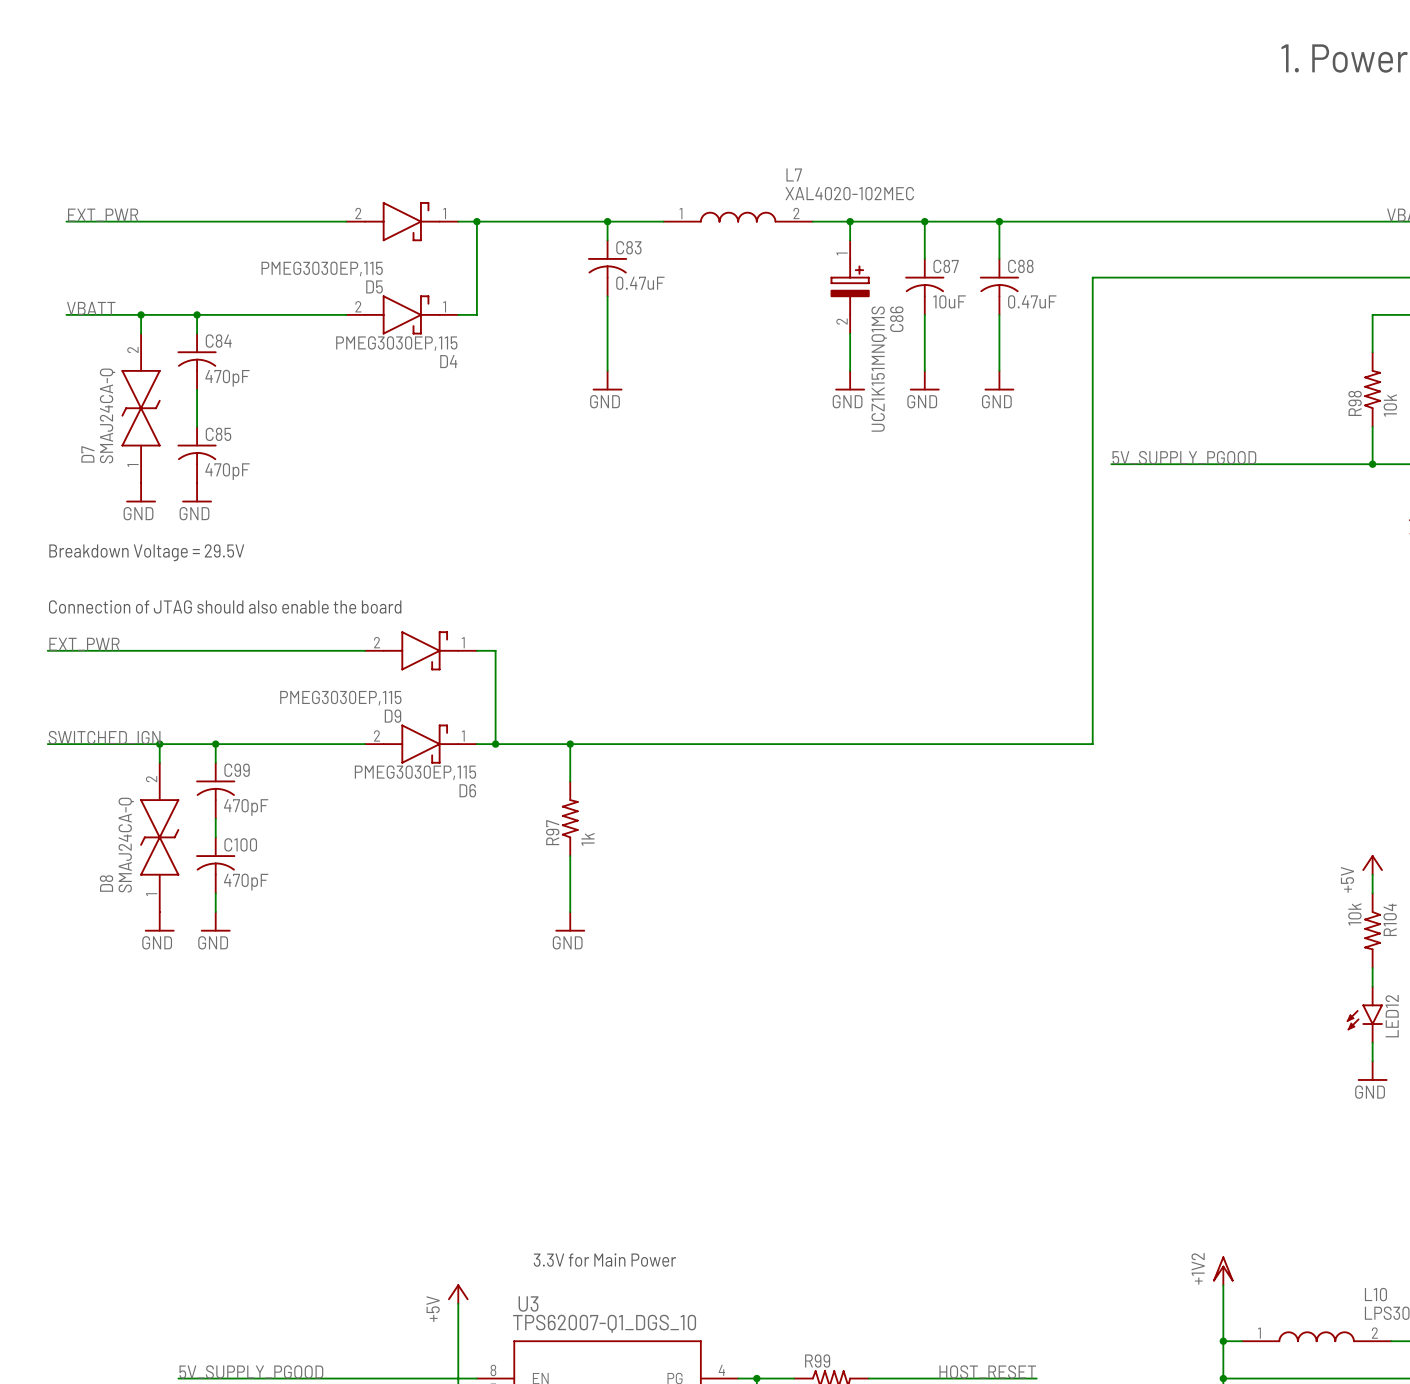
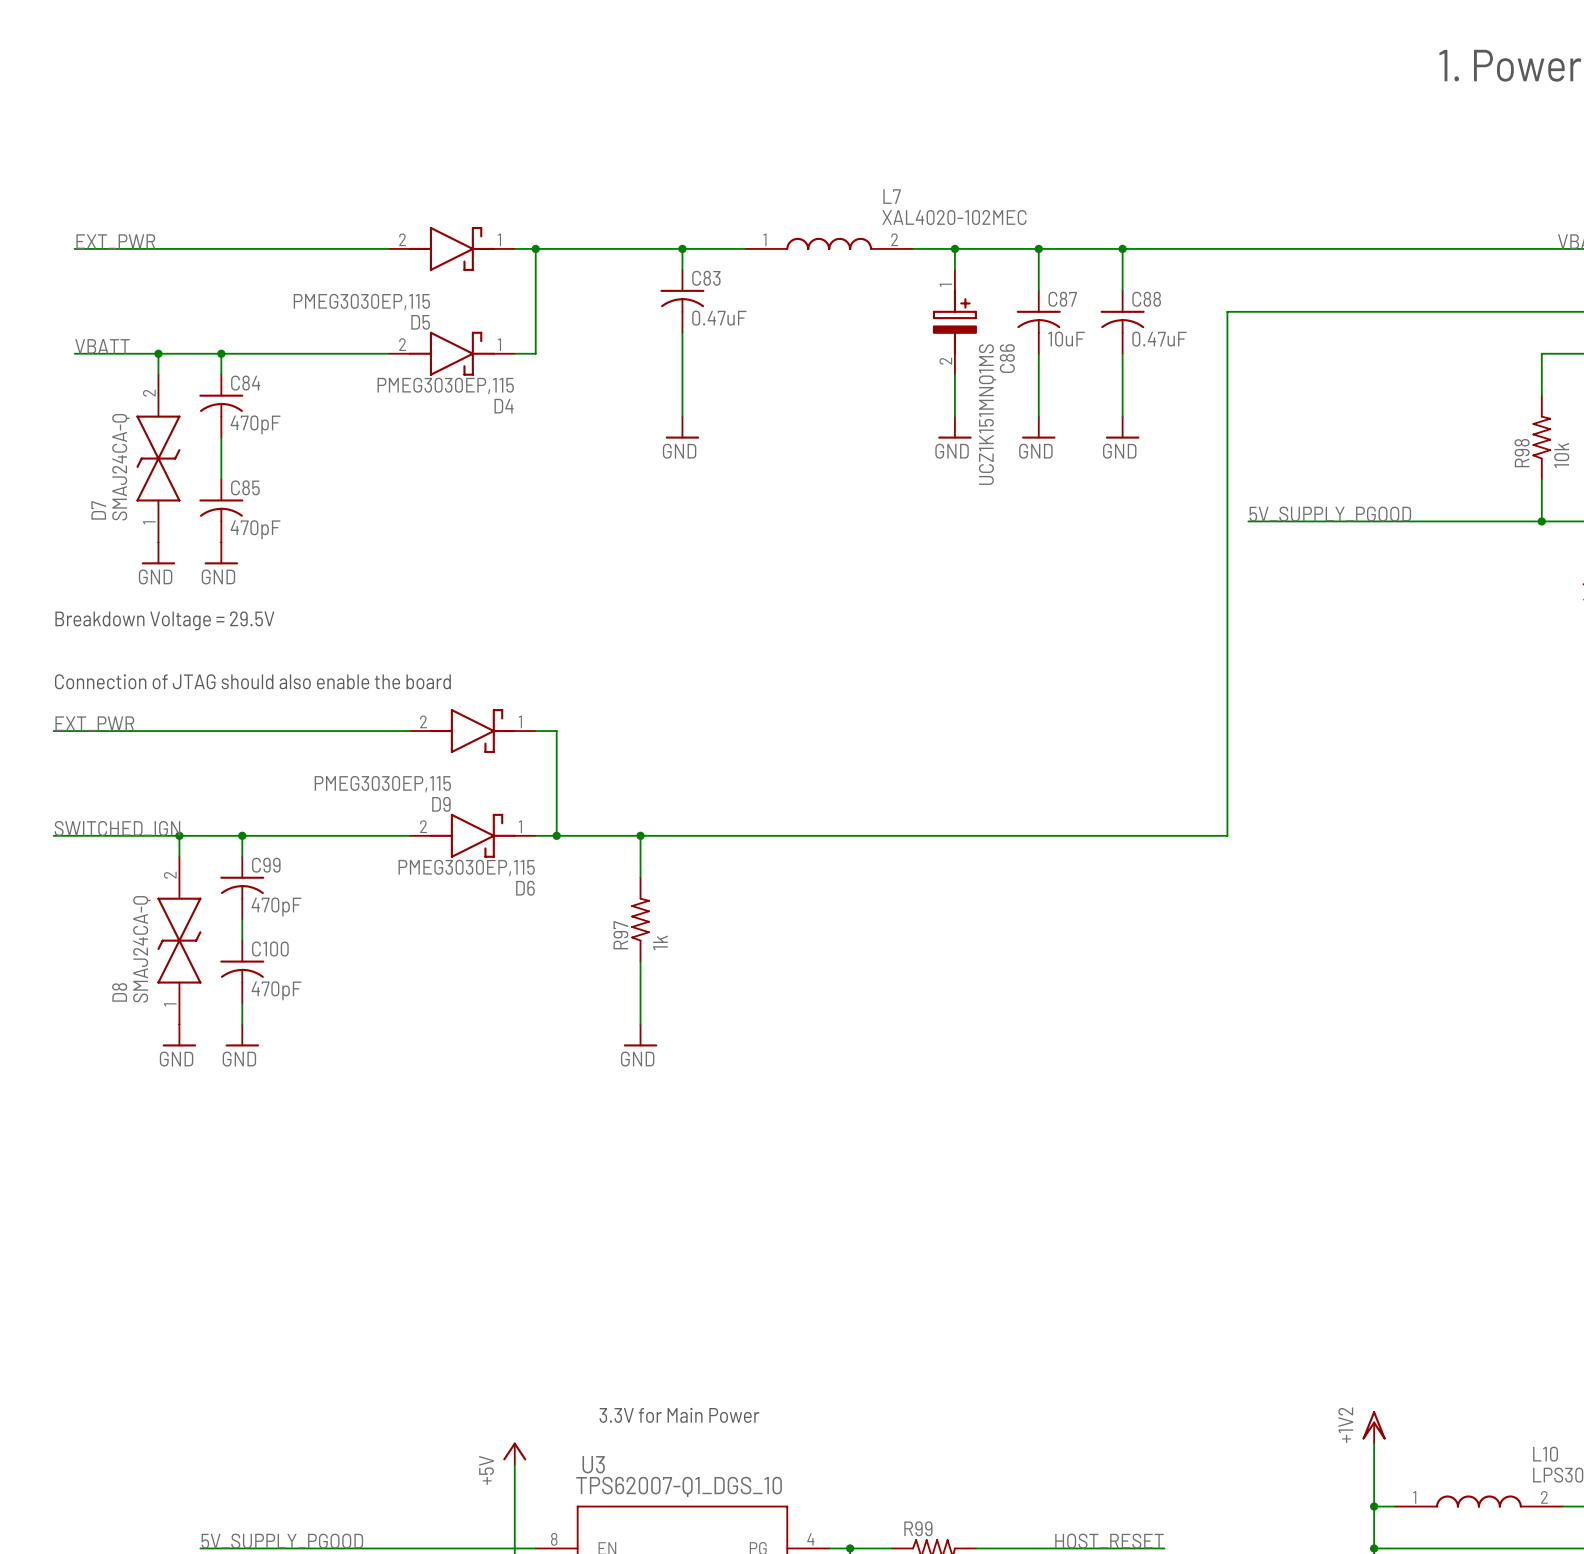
power symbol: +5V (1372, 864) -> none
wire: (1372, 874) (1372, 893) -> none
R104: 10k (1372, 930) -> none
wire: (1372, 968) (1372, 986) -> none
LED12: (1364, 1014) -> none
wire: (1372, 1042) (1372, 1061) -> none
power symbol: GND (1372, 1071) -> none

